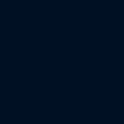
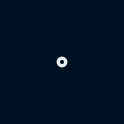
via: none -> (61, 61)

